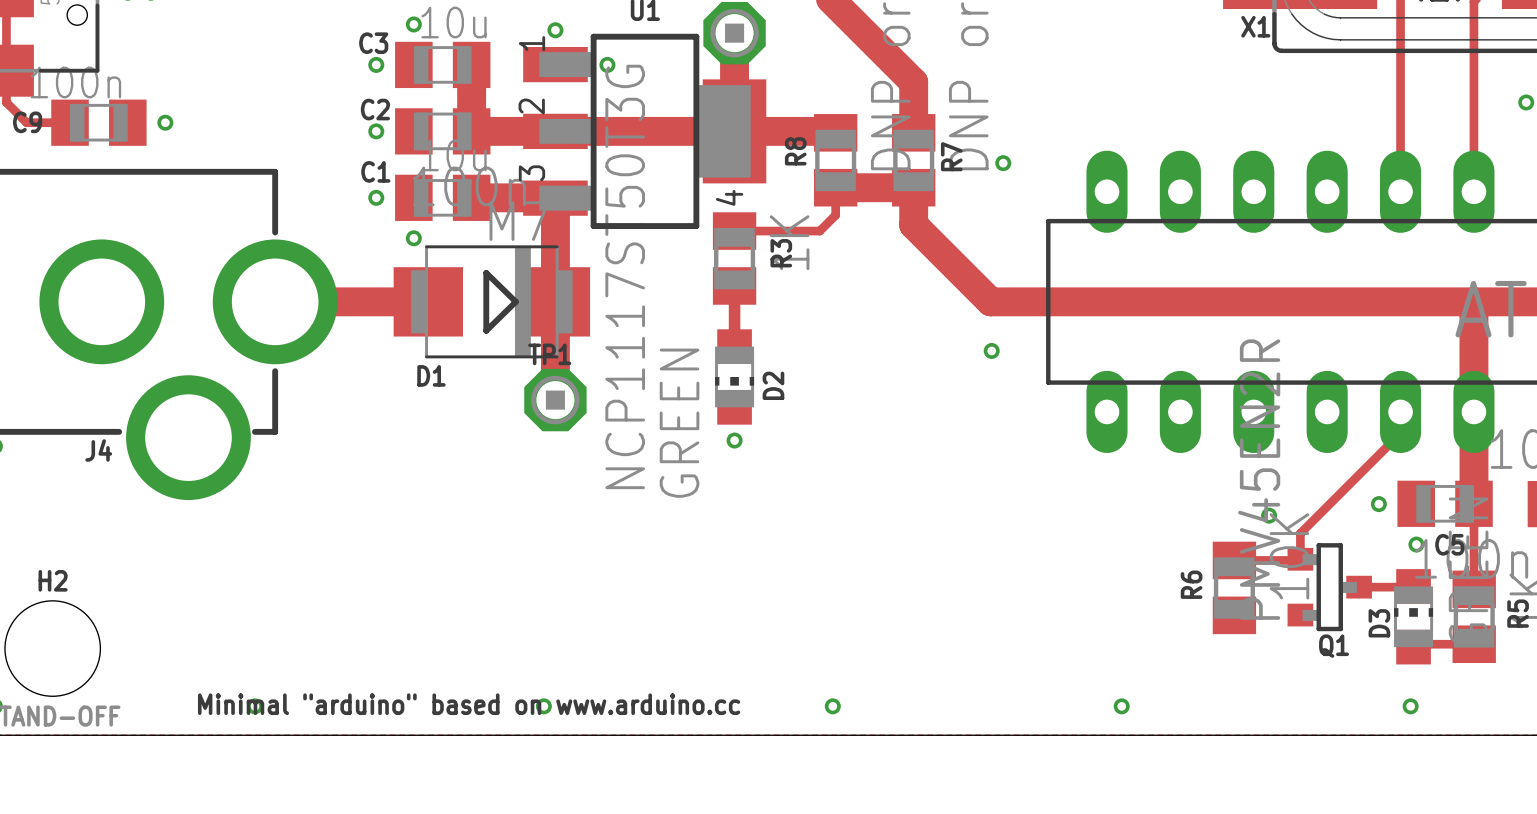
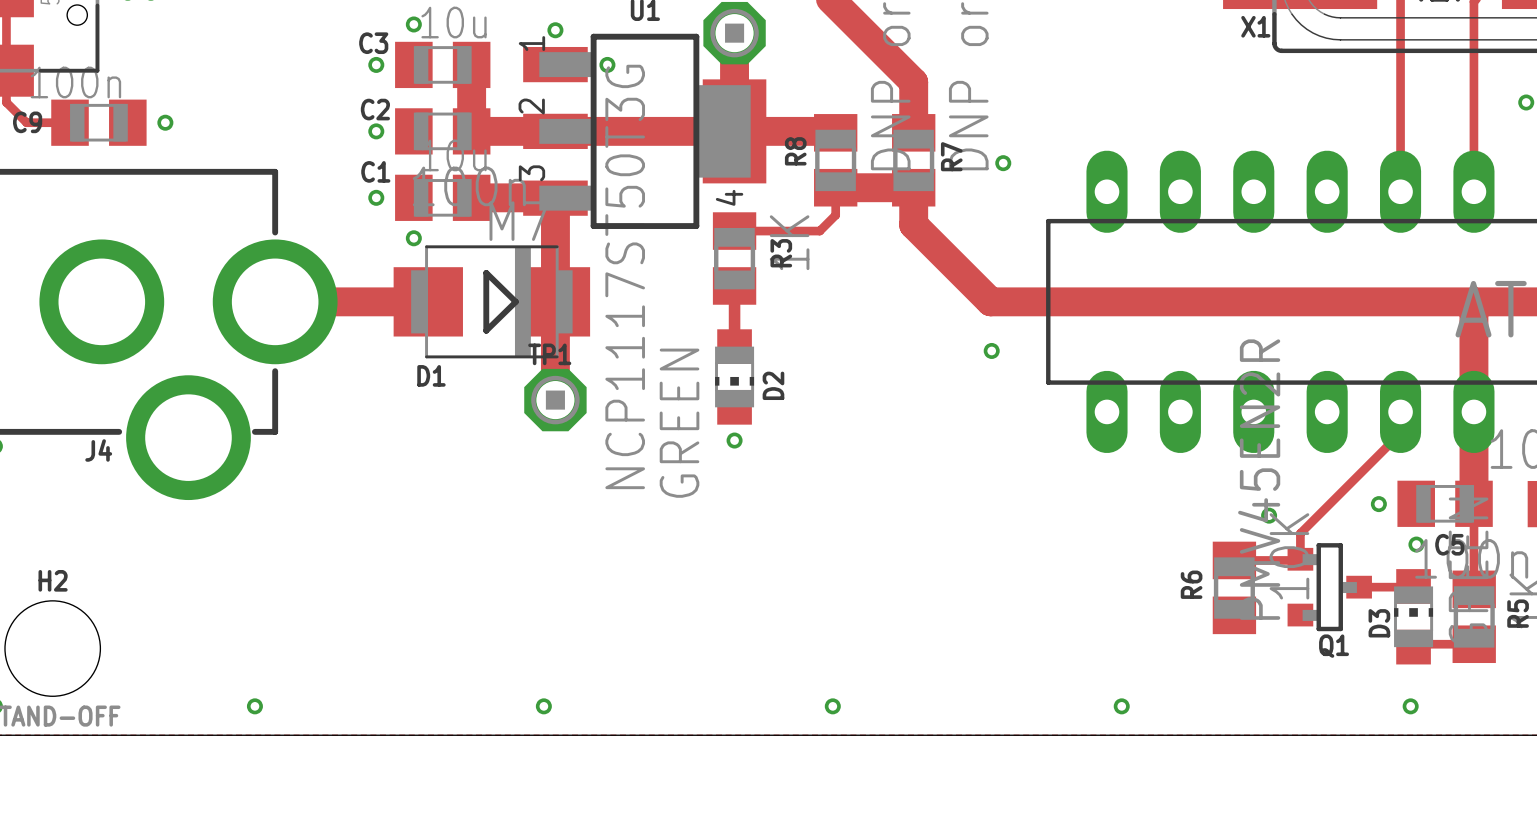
text: Minimal "arduino" based on www.arduino.cc (469, 704) -> none

